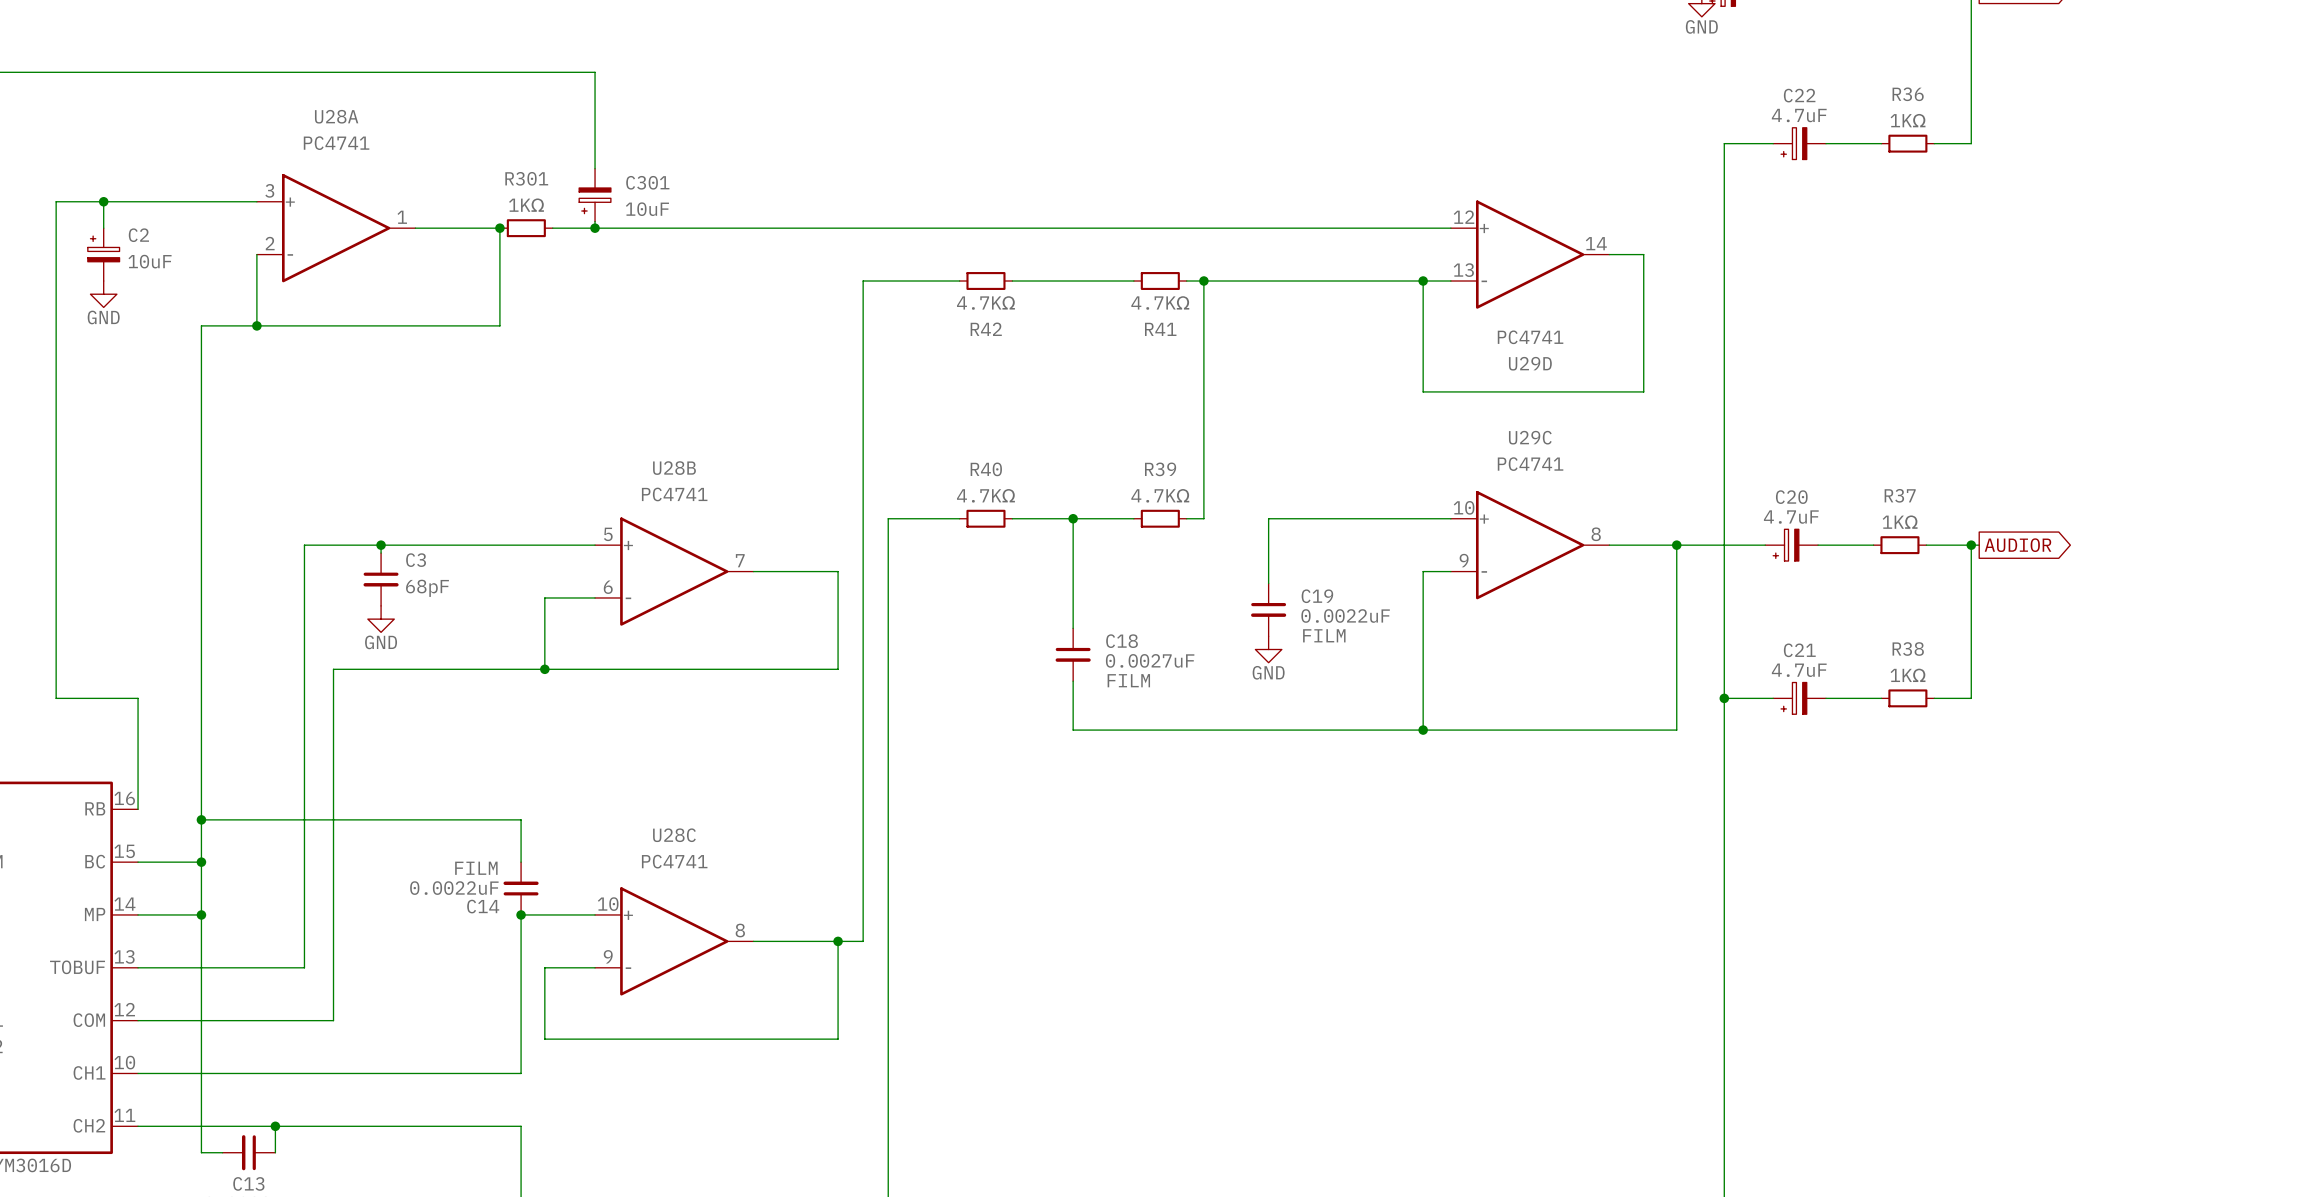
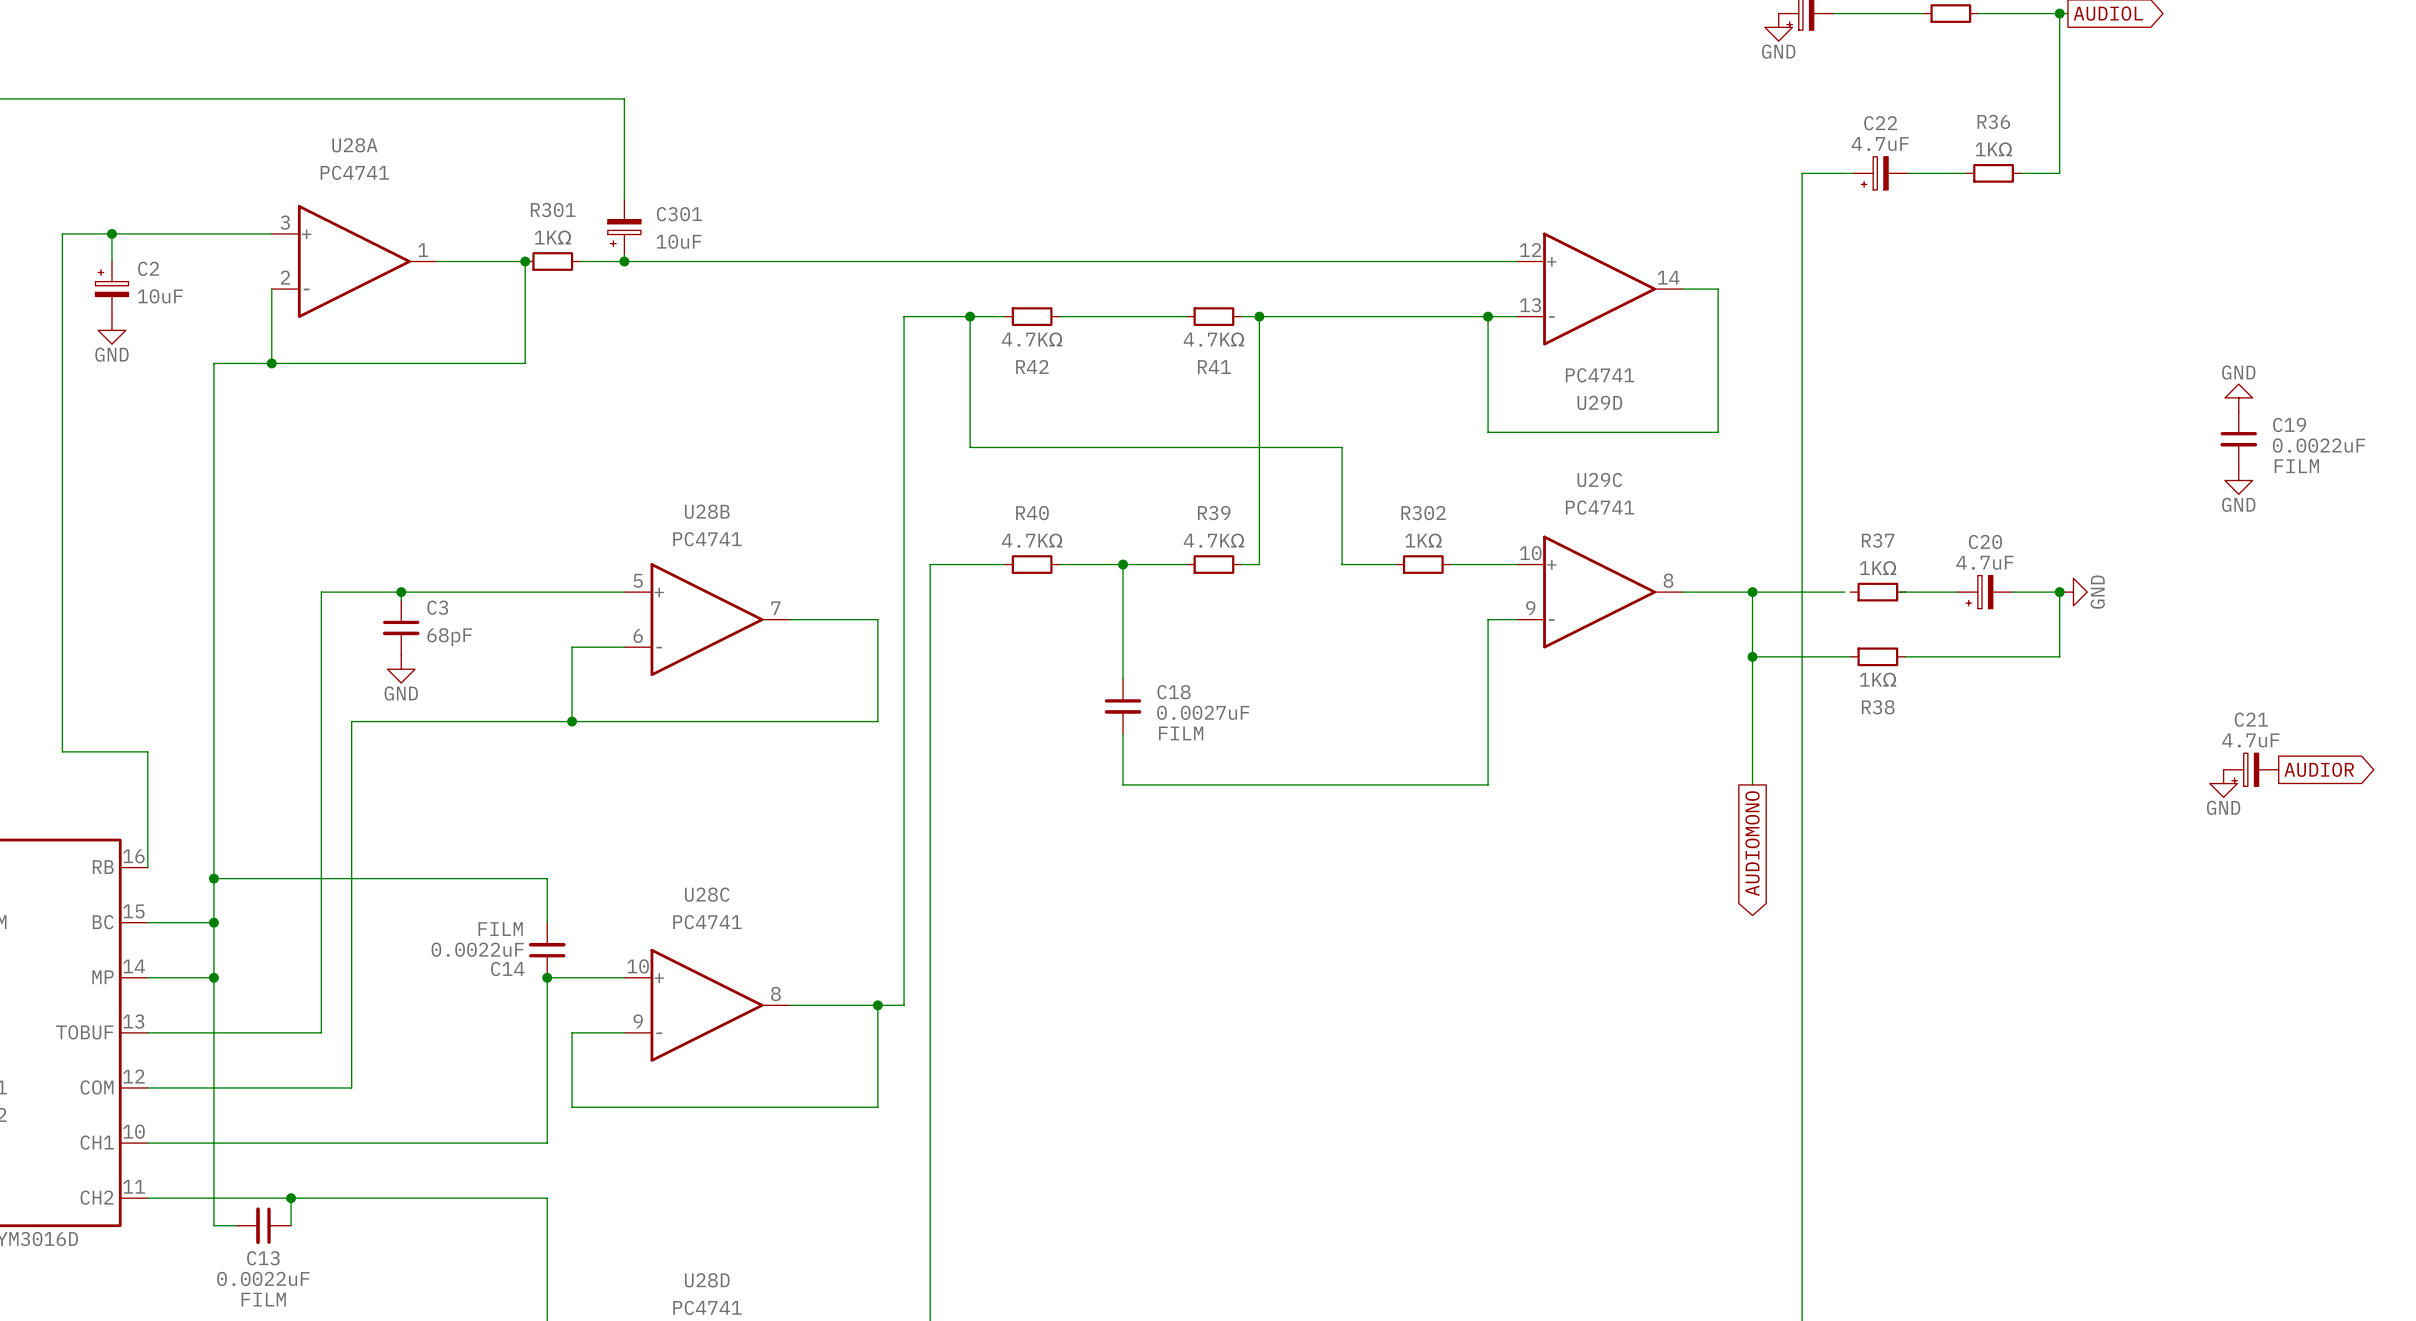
junction: none -> (970, 316)
power symbol: none -> GND (2238, 397)
power symbol: none -> GND (2238, 480)
wire: (1283, 518) (1268, 518) (1268, 583) -> (1342, 564) (1342, 447) (970, 447) (970, 316)
wire: (1334, 518) (1387, 518) -> none
R302: none -> 1KΩ (1423, 564)
C20 position: (1791, 545) -> (1985, 592)
R37 position: (1899, 545) -> (1877, 592)
power symbol: none -> GND (2073, 592)
global label: AUDIOR (2018, 545) -> none
wire: none -> (1752, 656) (1850, 656)
junction: none -> (1752, 656)
wire: (1971, 607) (1971, 698) (1934, 698) -> (2059, 656) (1905, 656)
C19 position: (1268, 609) -> (2238, 439)
power symbol: GND (1268, 649) -> none
R38 name position: R38 (1908, 649) -> R38 (1878, 707)
R38 value position: 1KΩ (1908, 675) -> 1KΩ (1878, 679)
wire: (1724, 698) (1773, 698) -> none
junction: (1724, 698) -> none
C21 position: (1799, 698) -> (2251, 769)
wire: (1825, 698) (1881, 698) -> none
R38 position: (1907, 698) -> (1877, 656)
global label: none -> AUDIOR (2319, 769)
power symbol: none -> GND (2223, 783)
wire: (1423, 730) (1676, 730) -> none
junction: (1423, 730) -> none
global label: none -> AUDIOMONO (1752, 843)

